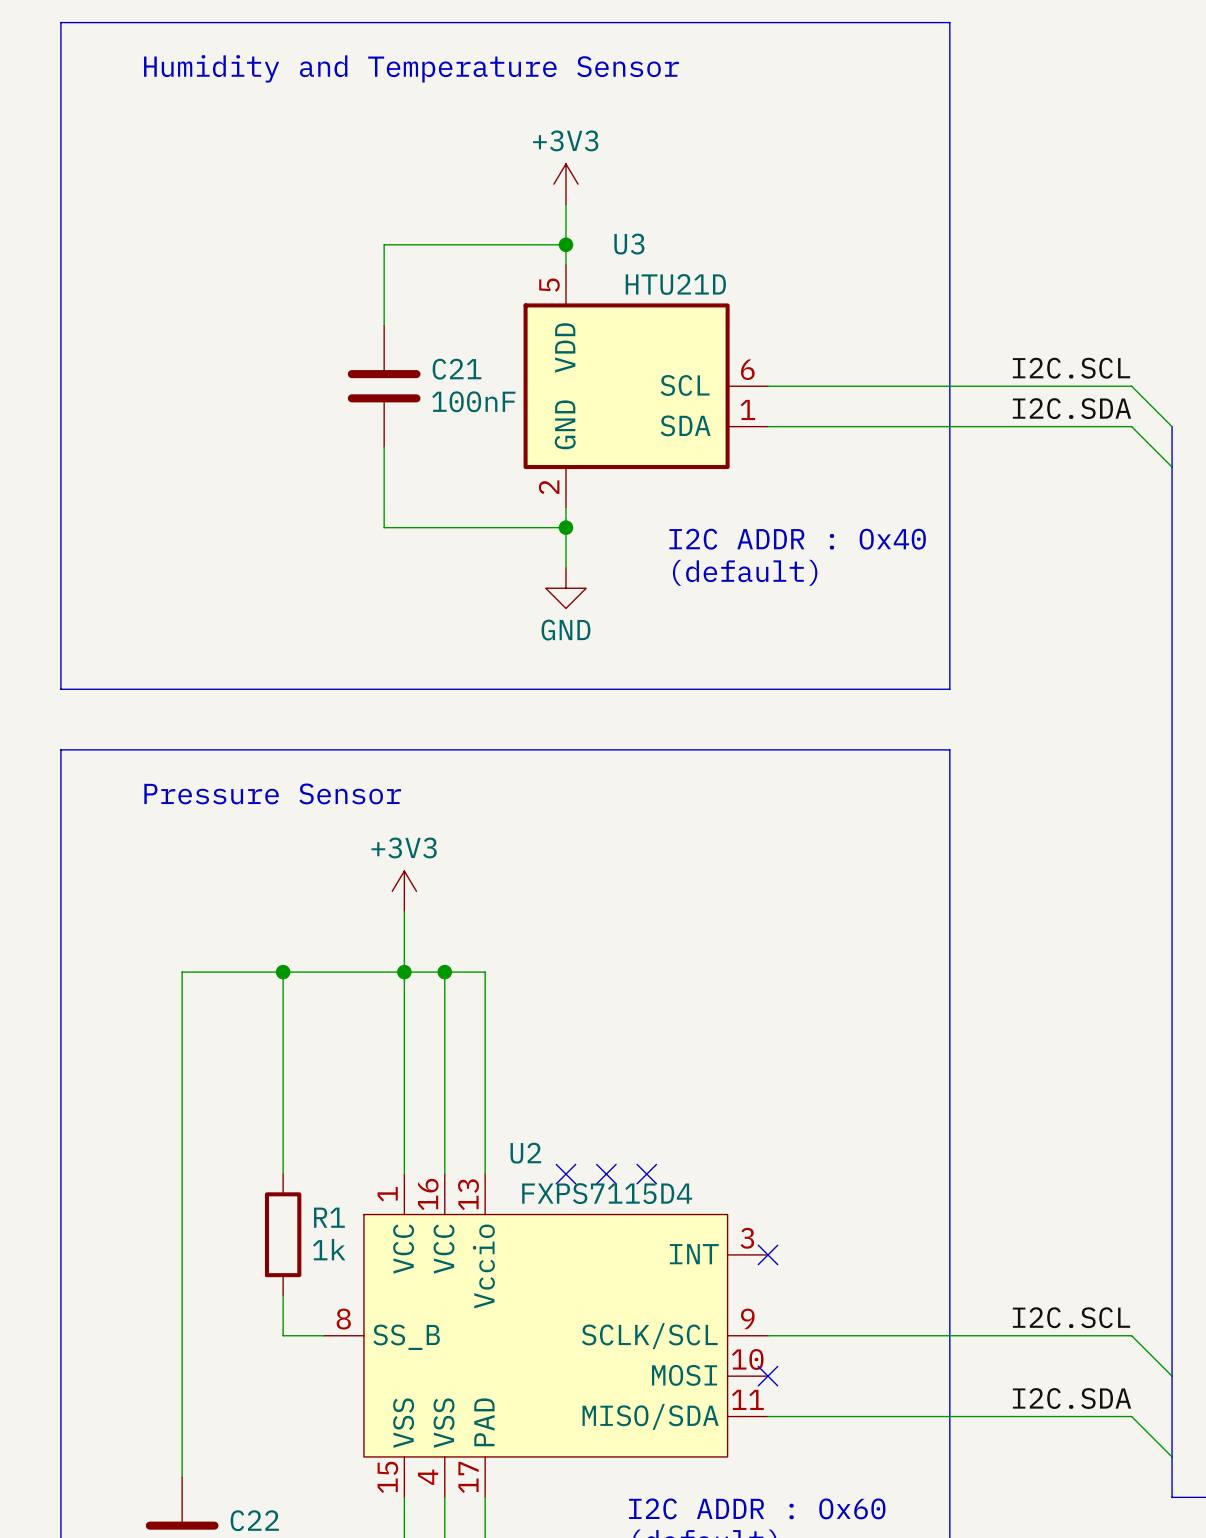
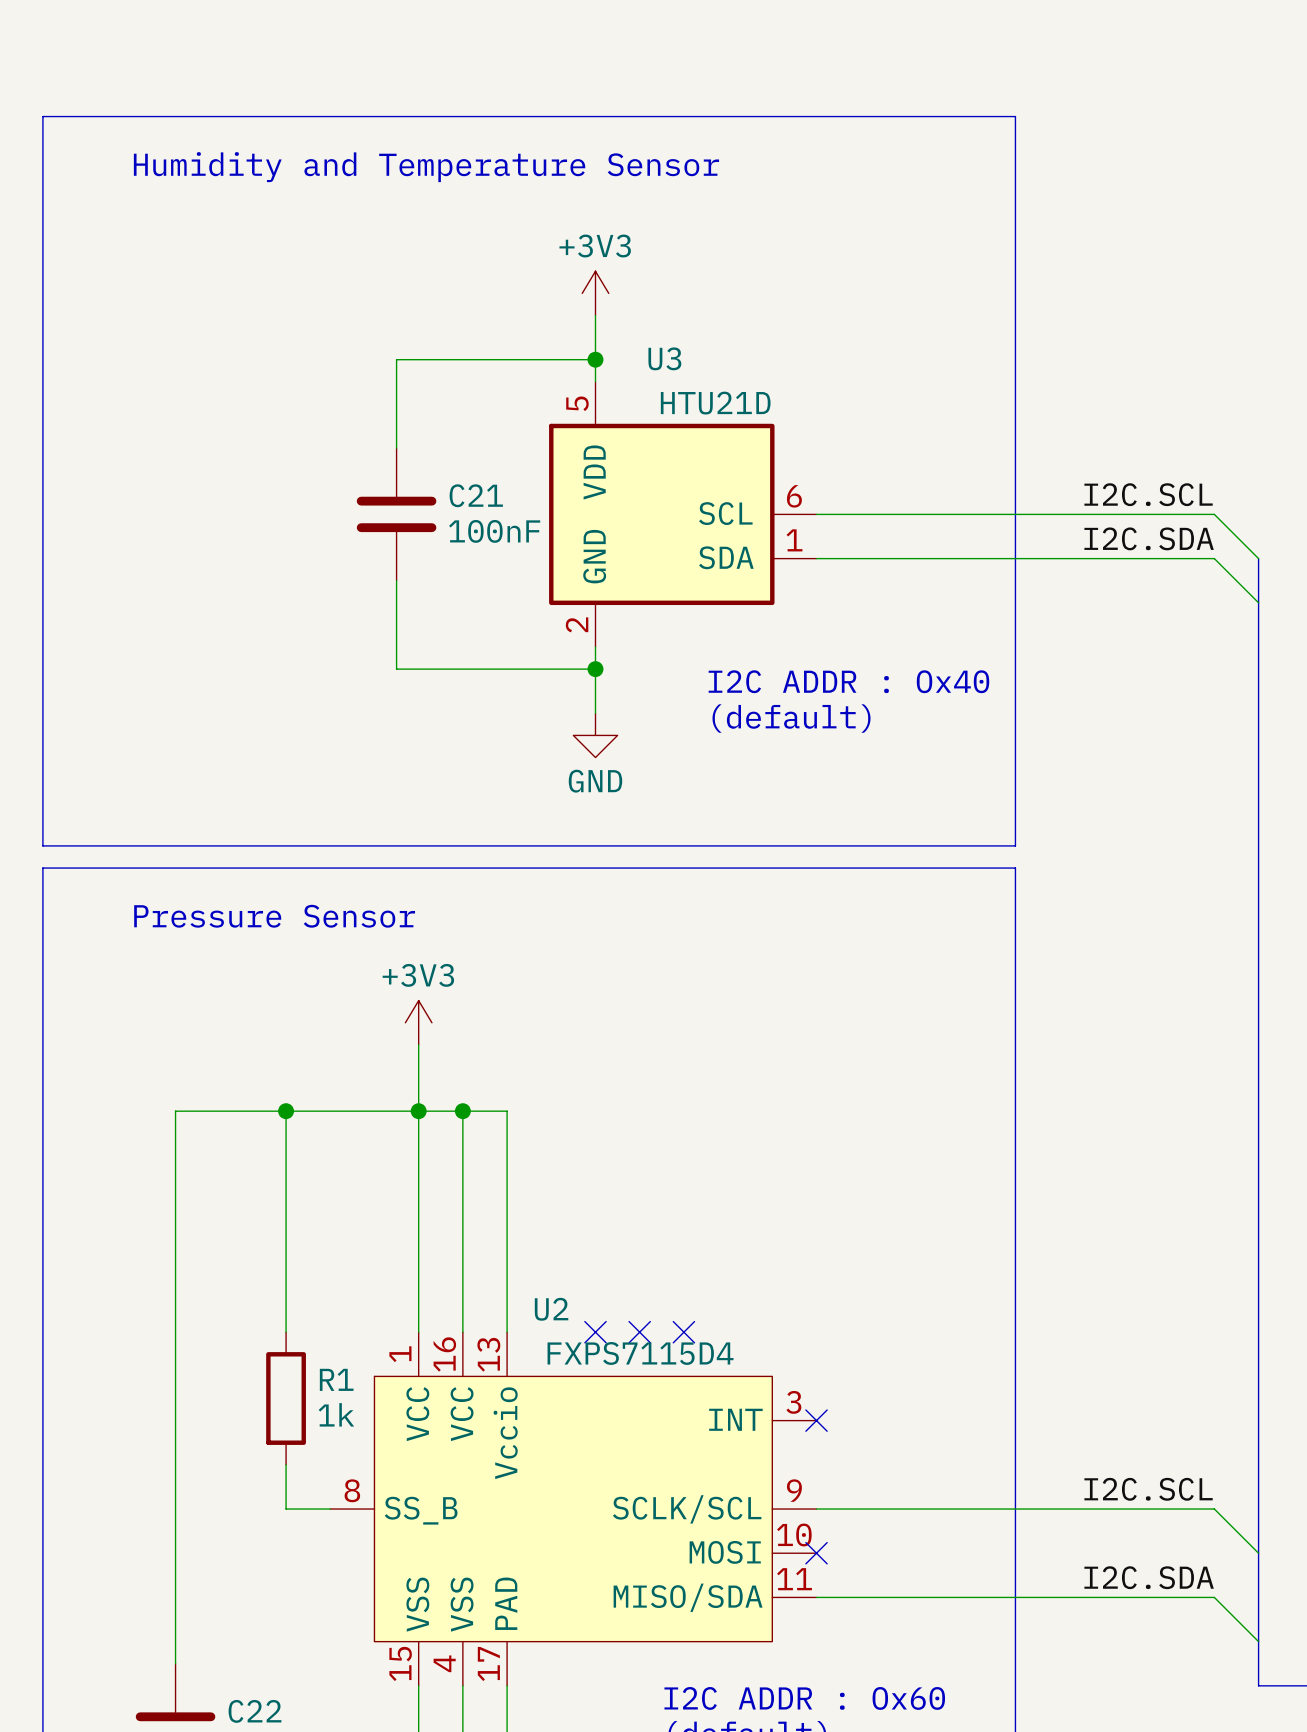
line: (60, 62) (60, 22) (949, 22) (949, 62) -> (42, 116) (1015, 116)
text position: Humidity and Temperature Sensor (411, 68) -> Humidity and Temperature Sensor (426, 167)
power symbol position: +3V3 (565, 184) -> +3V3 (595, 293)
wire: (565, 204) (565, 244) (384, 244) (384, 285) -> (595, 359) (396, 359)
junction position: (565, 244) -> (595, 359)
label: I2C.SCL (1071, 368) -> none
C21 position: (384, 386) -> (396, 514)
U3 position: (645, 386) -> (682, 514)
wire: (768, 386) (1131, 386) (1172, 426) -> (816, 558) (1214, 558) (1258, 602)
label: I2C.SDA (1072, 408) -> I2C.SCL (1148, 494)
bus: (1172, 426) (1172, 467) -> none
label: none -> I2C.SDA (1149, 538)
wire: (384, 527) (565, 527) -> (396, 624) (396, 669) (595, 669) (595, 713)
junction position: (565, 527) -> (595, 669)
text position: I2C ADDR : Ox40 (797, 539) -> I2C ADDR : Ox40 (848, 681)
text position: (default) (745, 572) -> (default) (791, 718)
power symbol position: GND (565, 588) -> GND (595, 735)
line: (60, 689) (949, 689) -> (42, 801) (42, 845) (1015, 845) (1015, 801)

